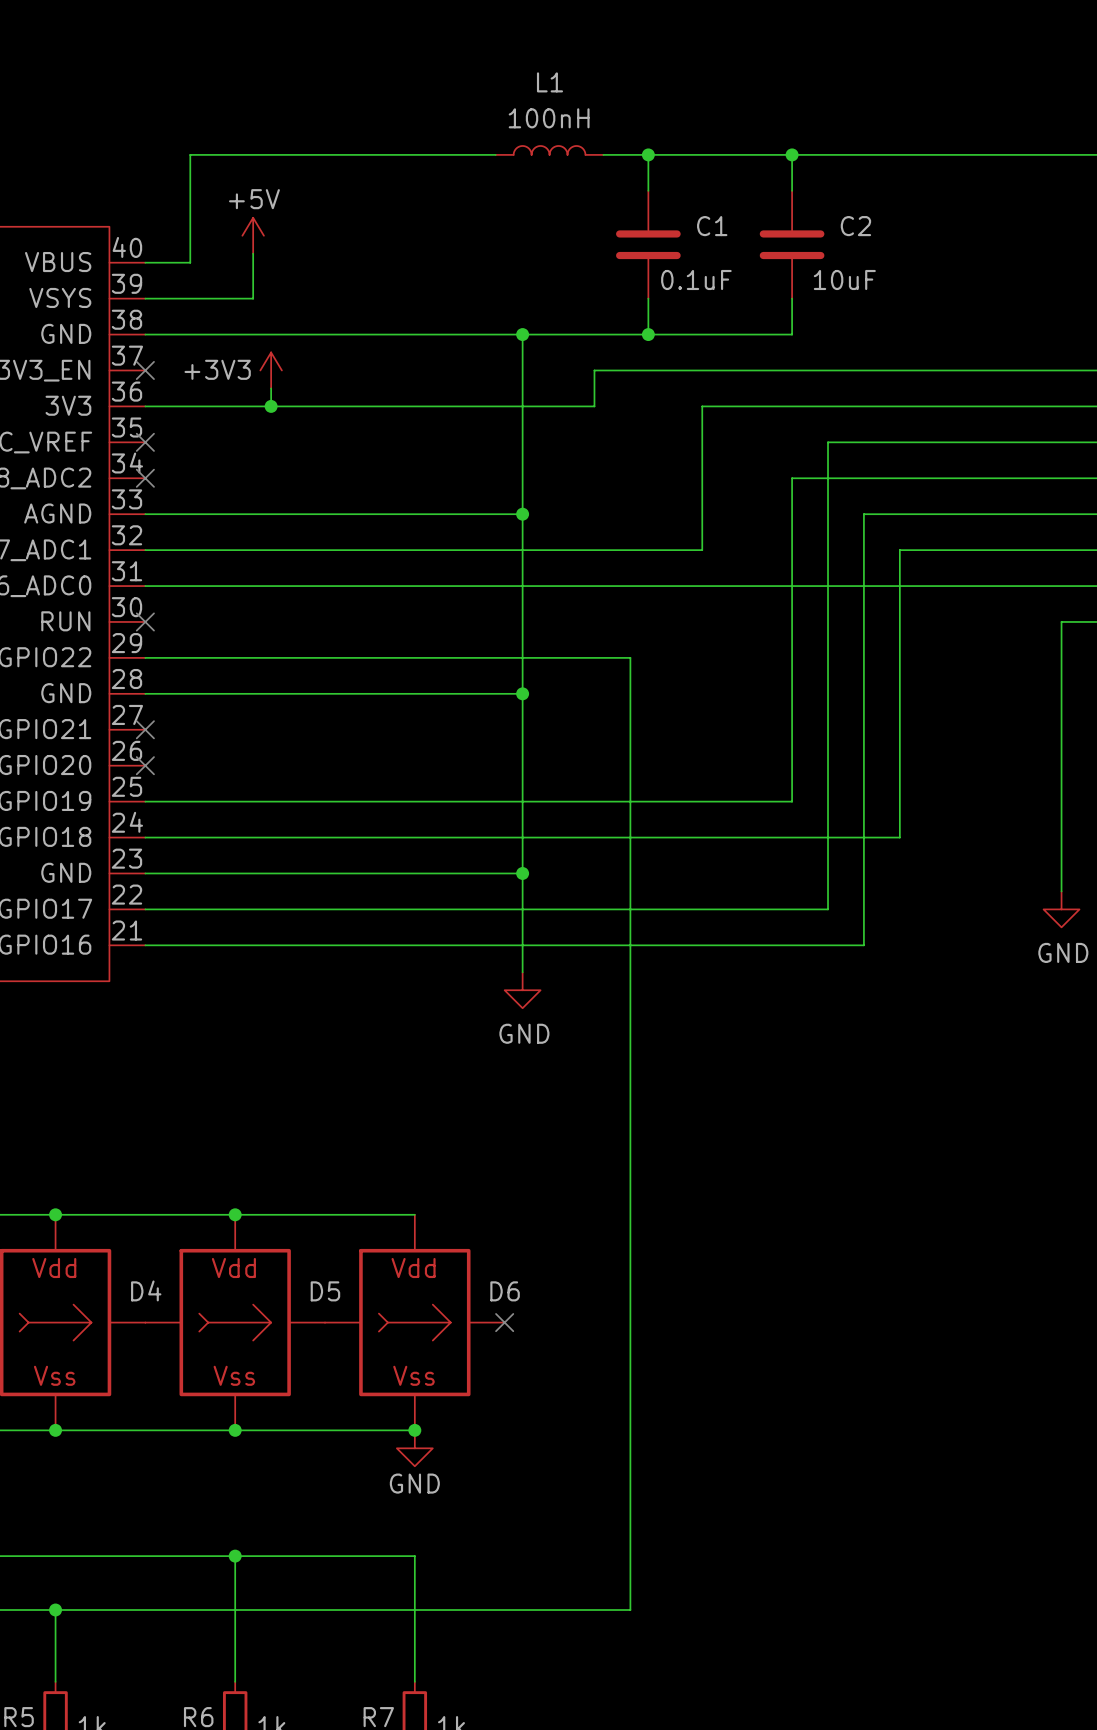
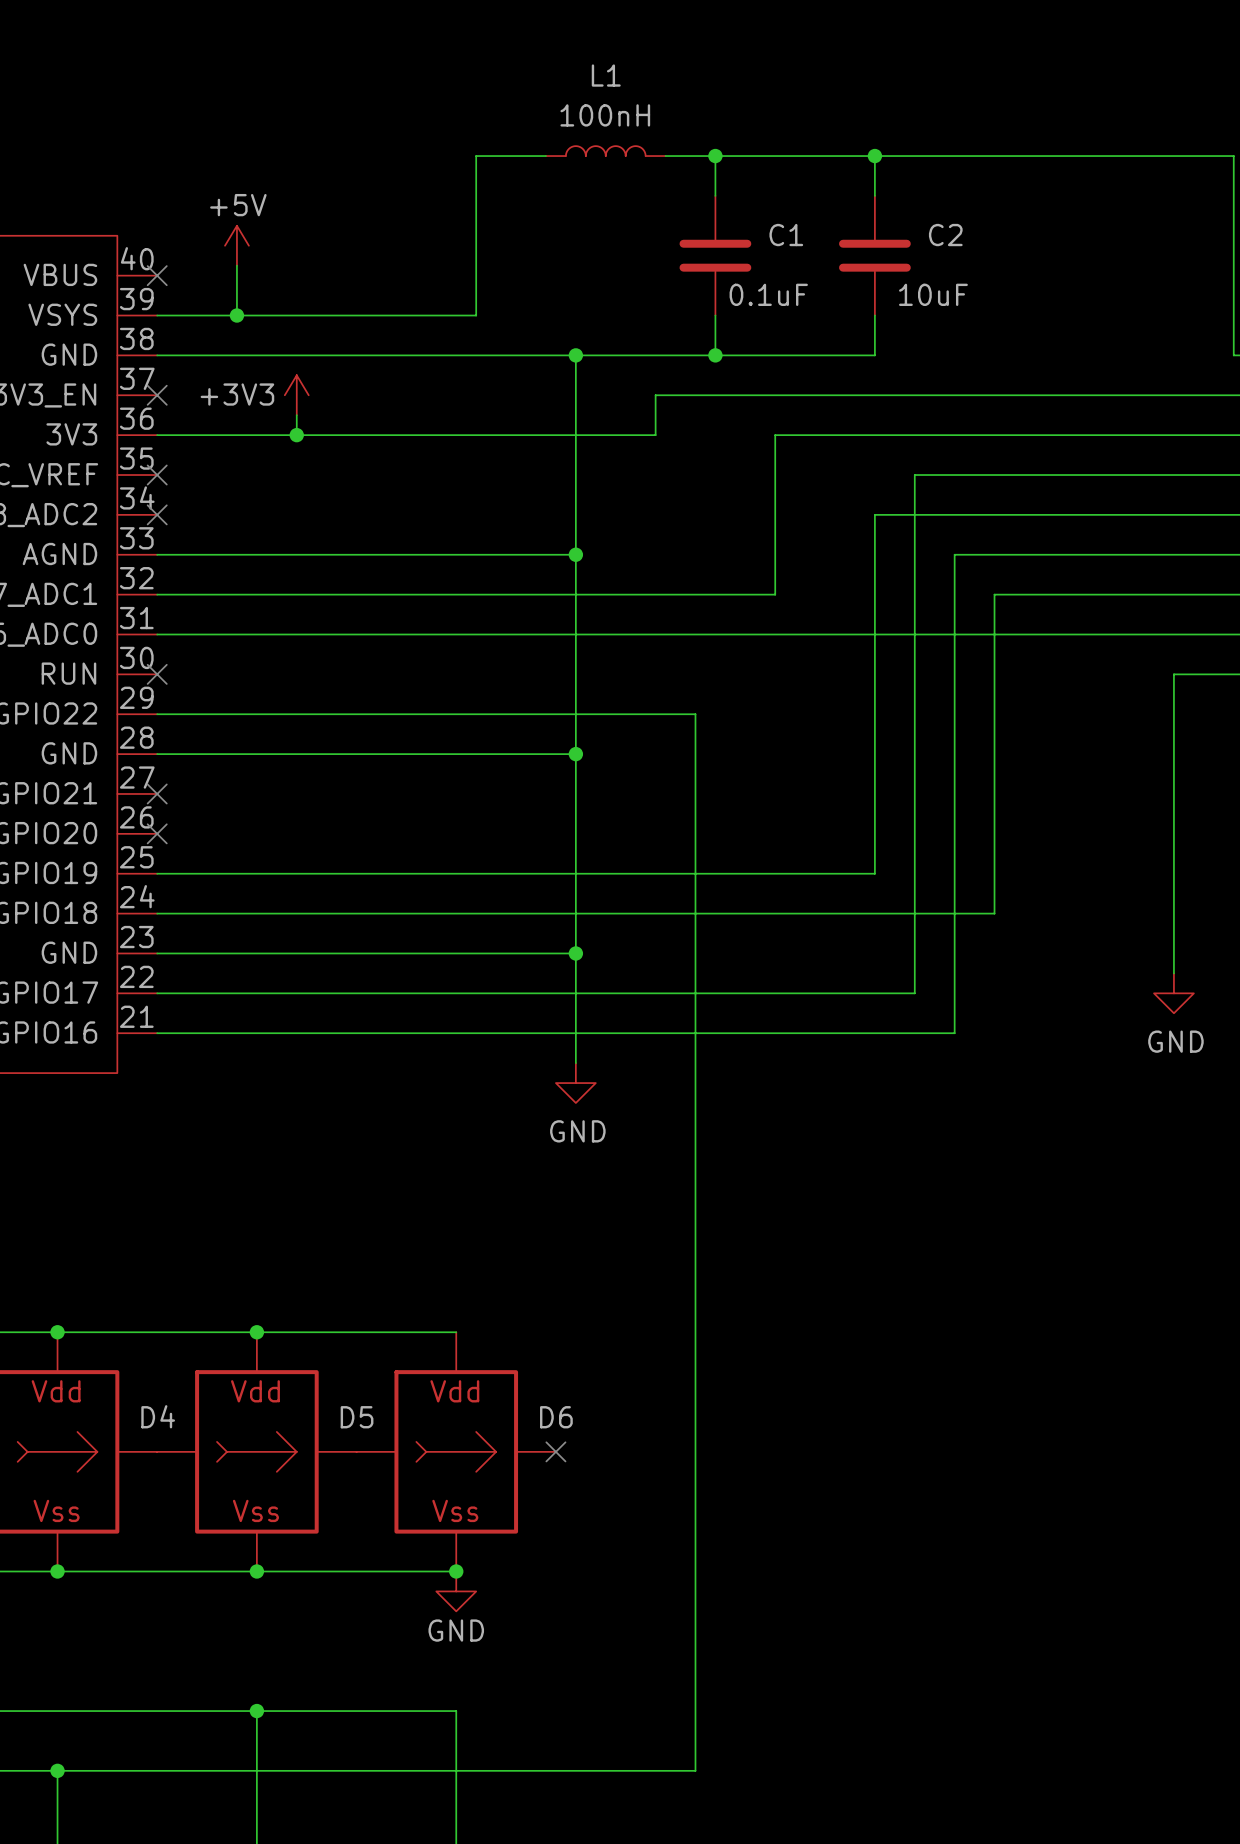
wire: (432, 154) (190, 154) (190, 262) (145, 262) -> (476, 156) (476, 315) (276, 315)
power symbol position: +5V (253, 235) -> +5V (236, 245)
wire: (253, 253) (253, 298) -> (236, 265) (236, 315)
no-connect mark: none -> (157, 275)
junction: none -> (236, 315)

